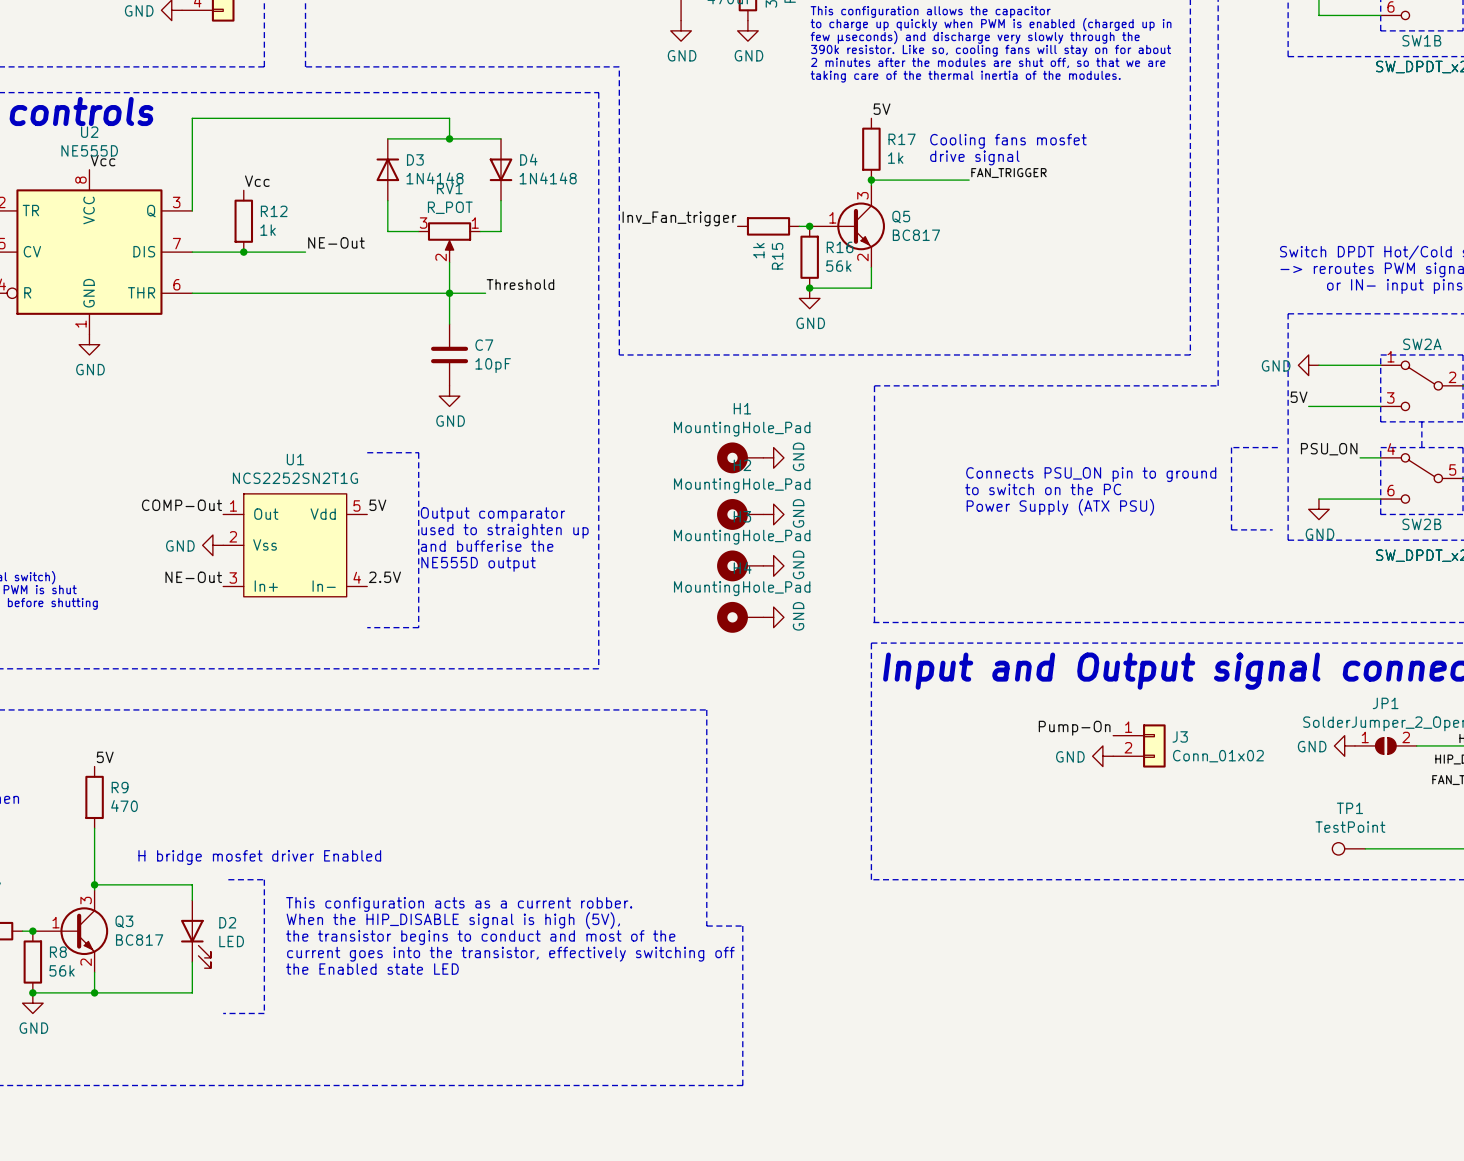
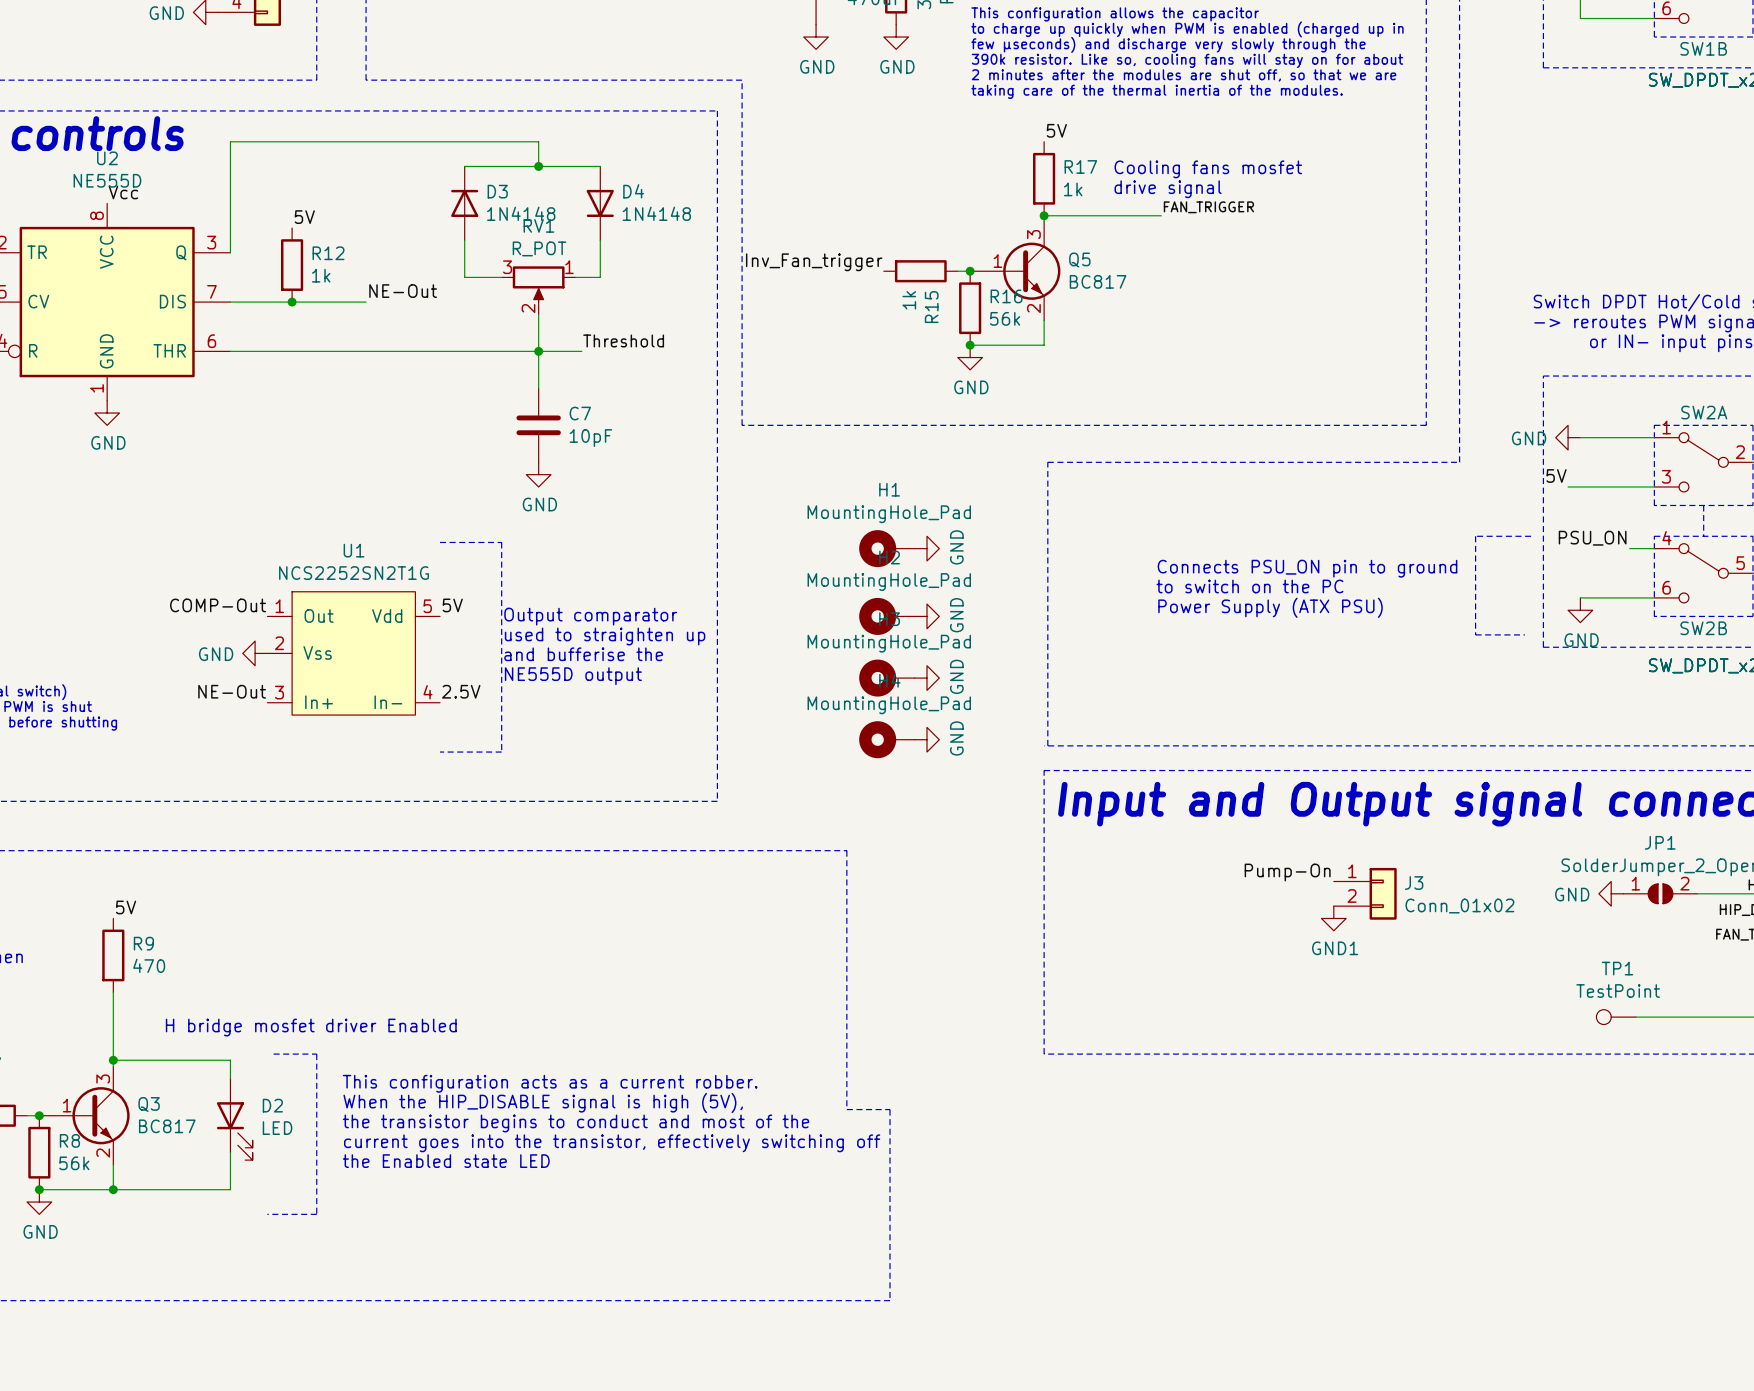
label: Vcc (257, 181) -> 5V (304, 217)
power symbol: GND (1102, 756) -> none
power symbol: none -> GND1 (1333, 918)

